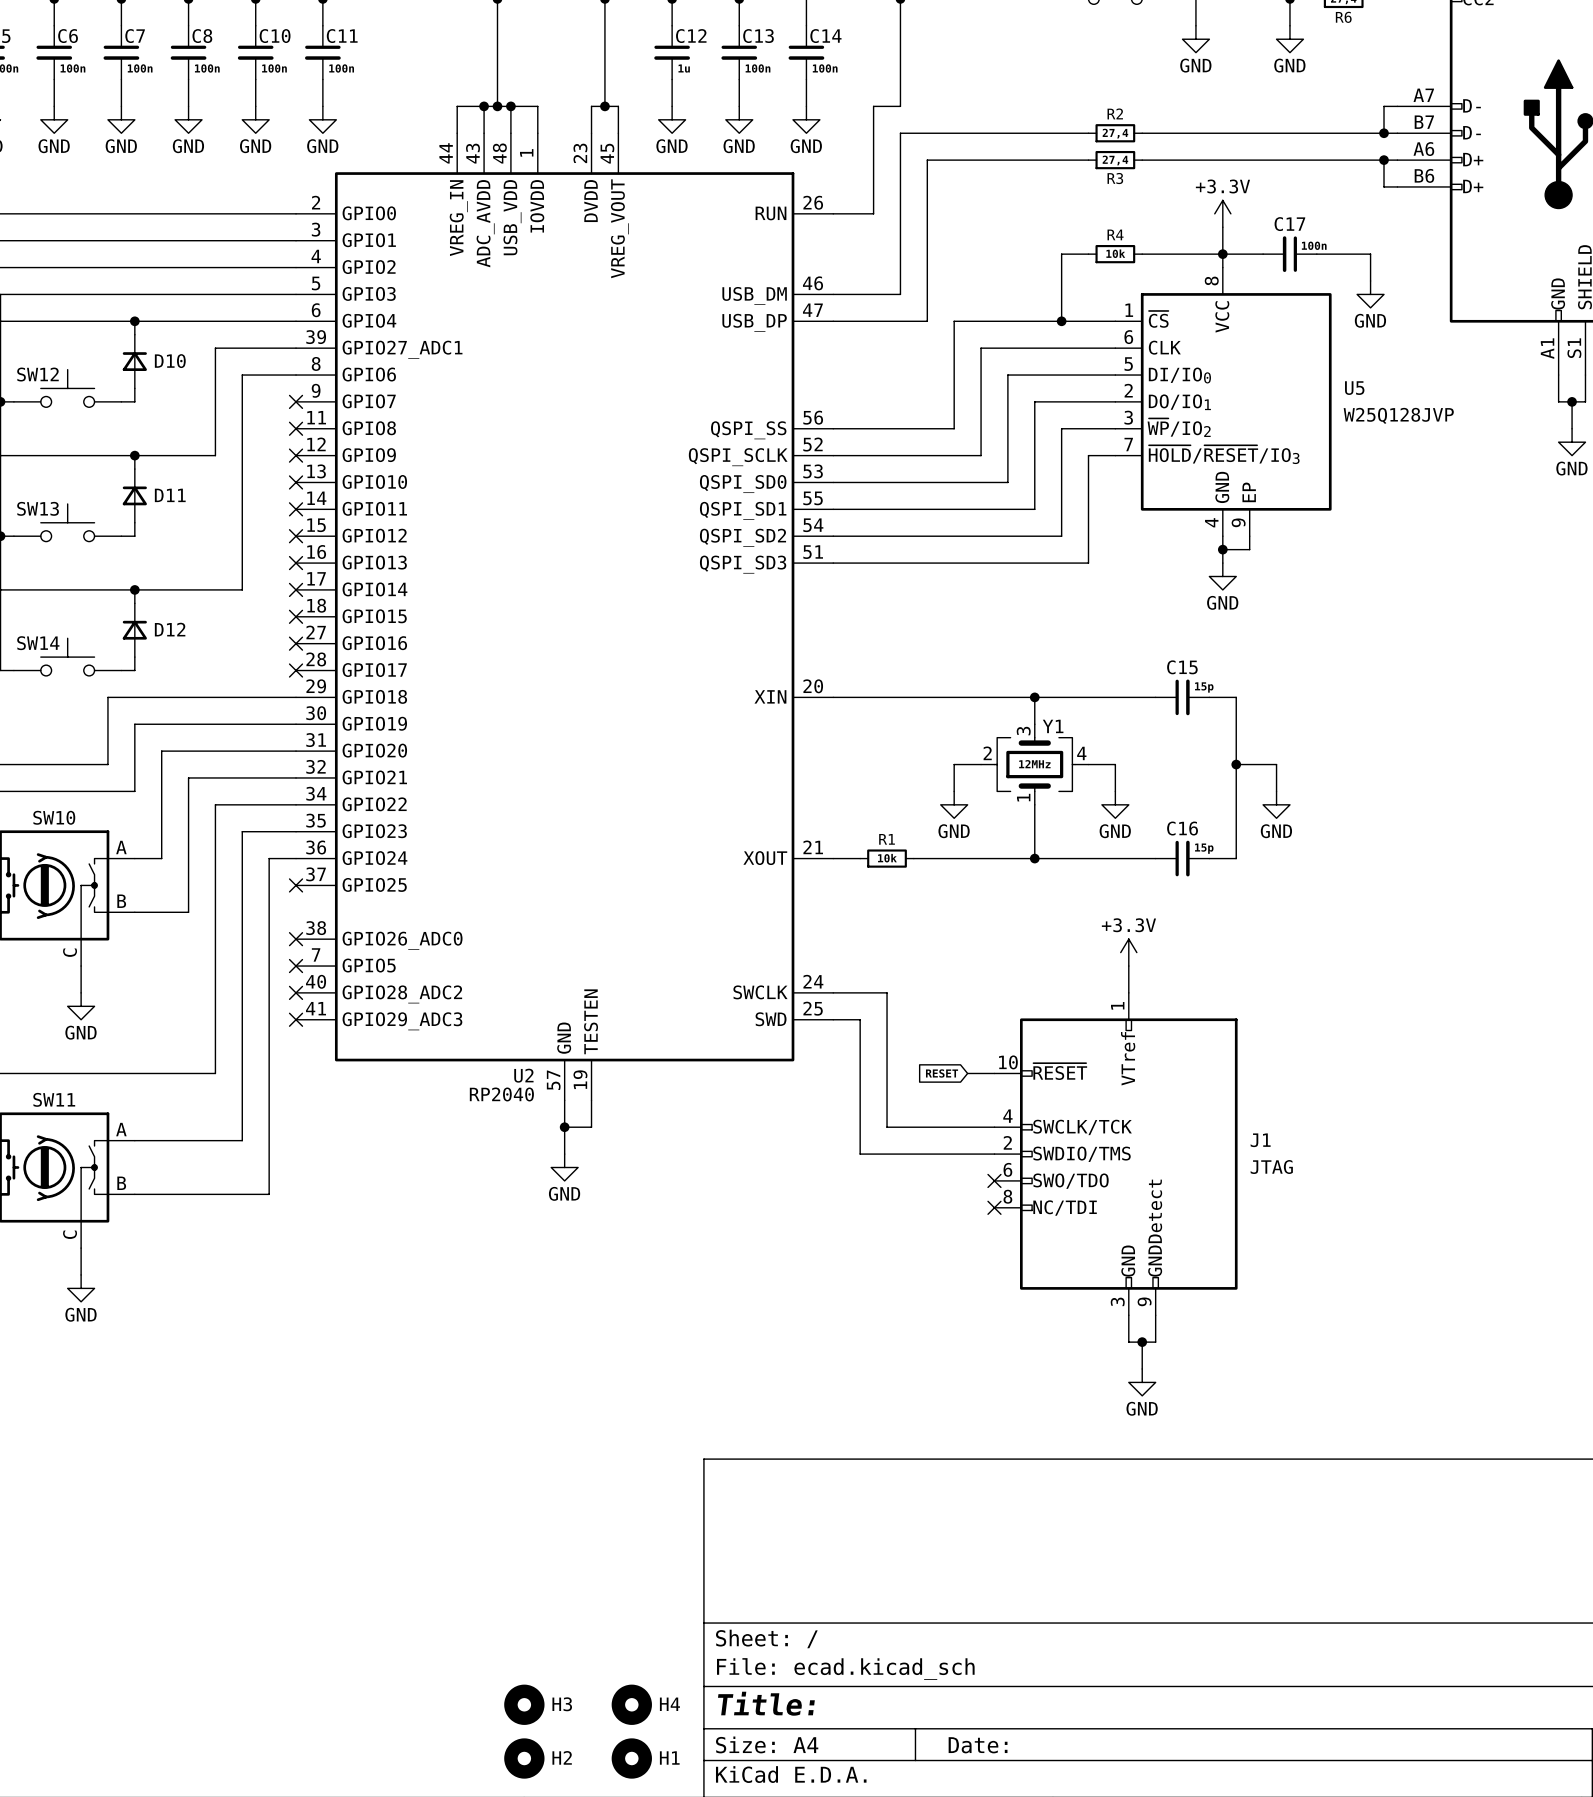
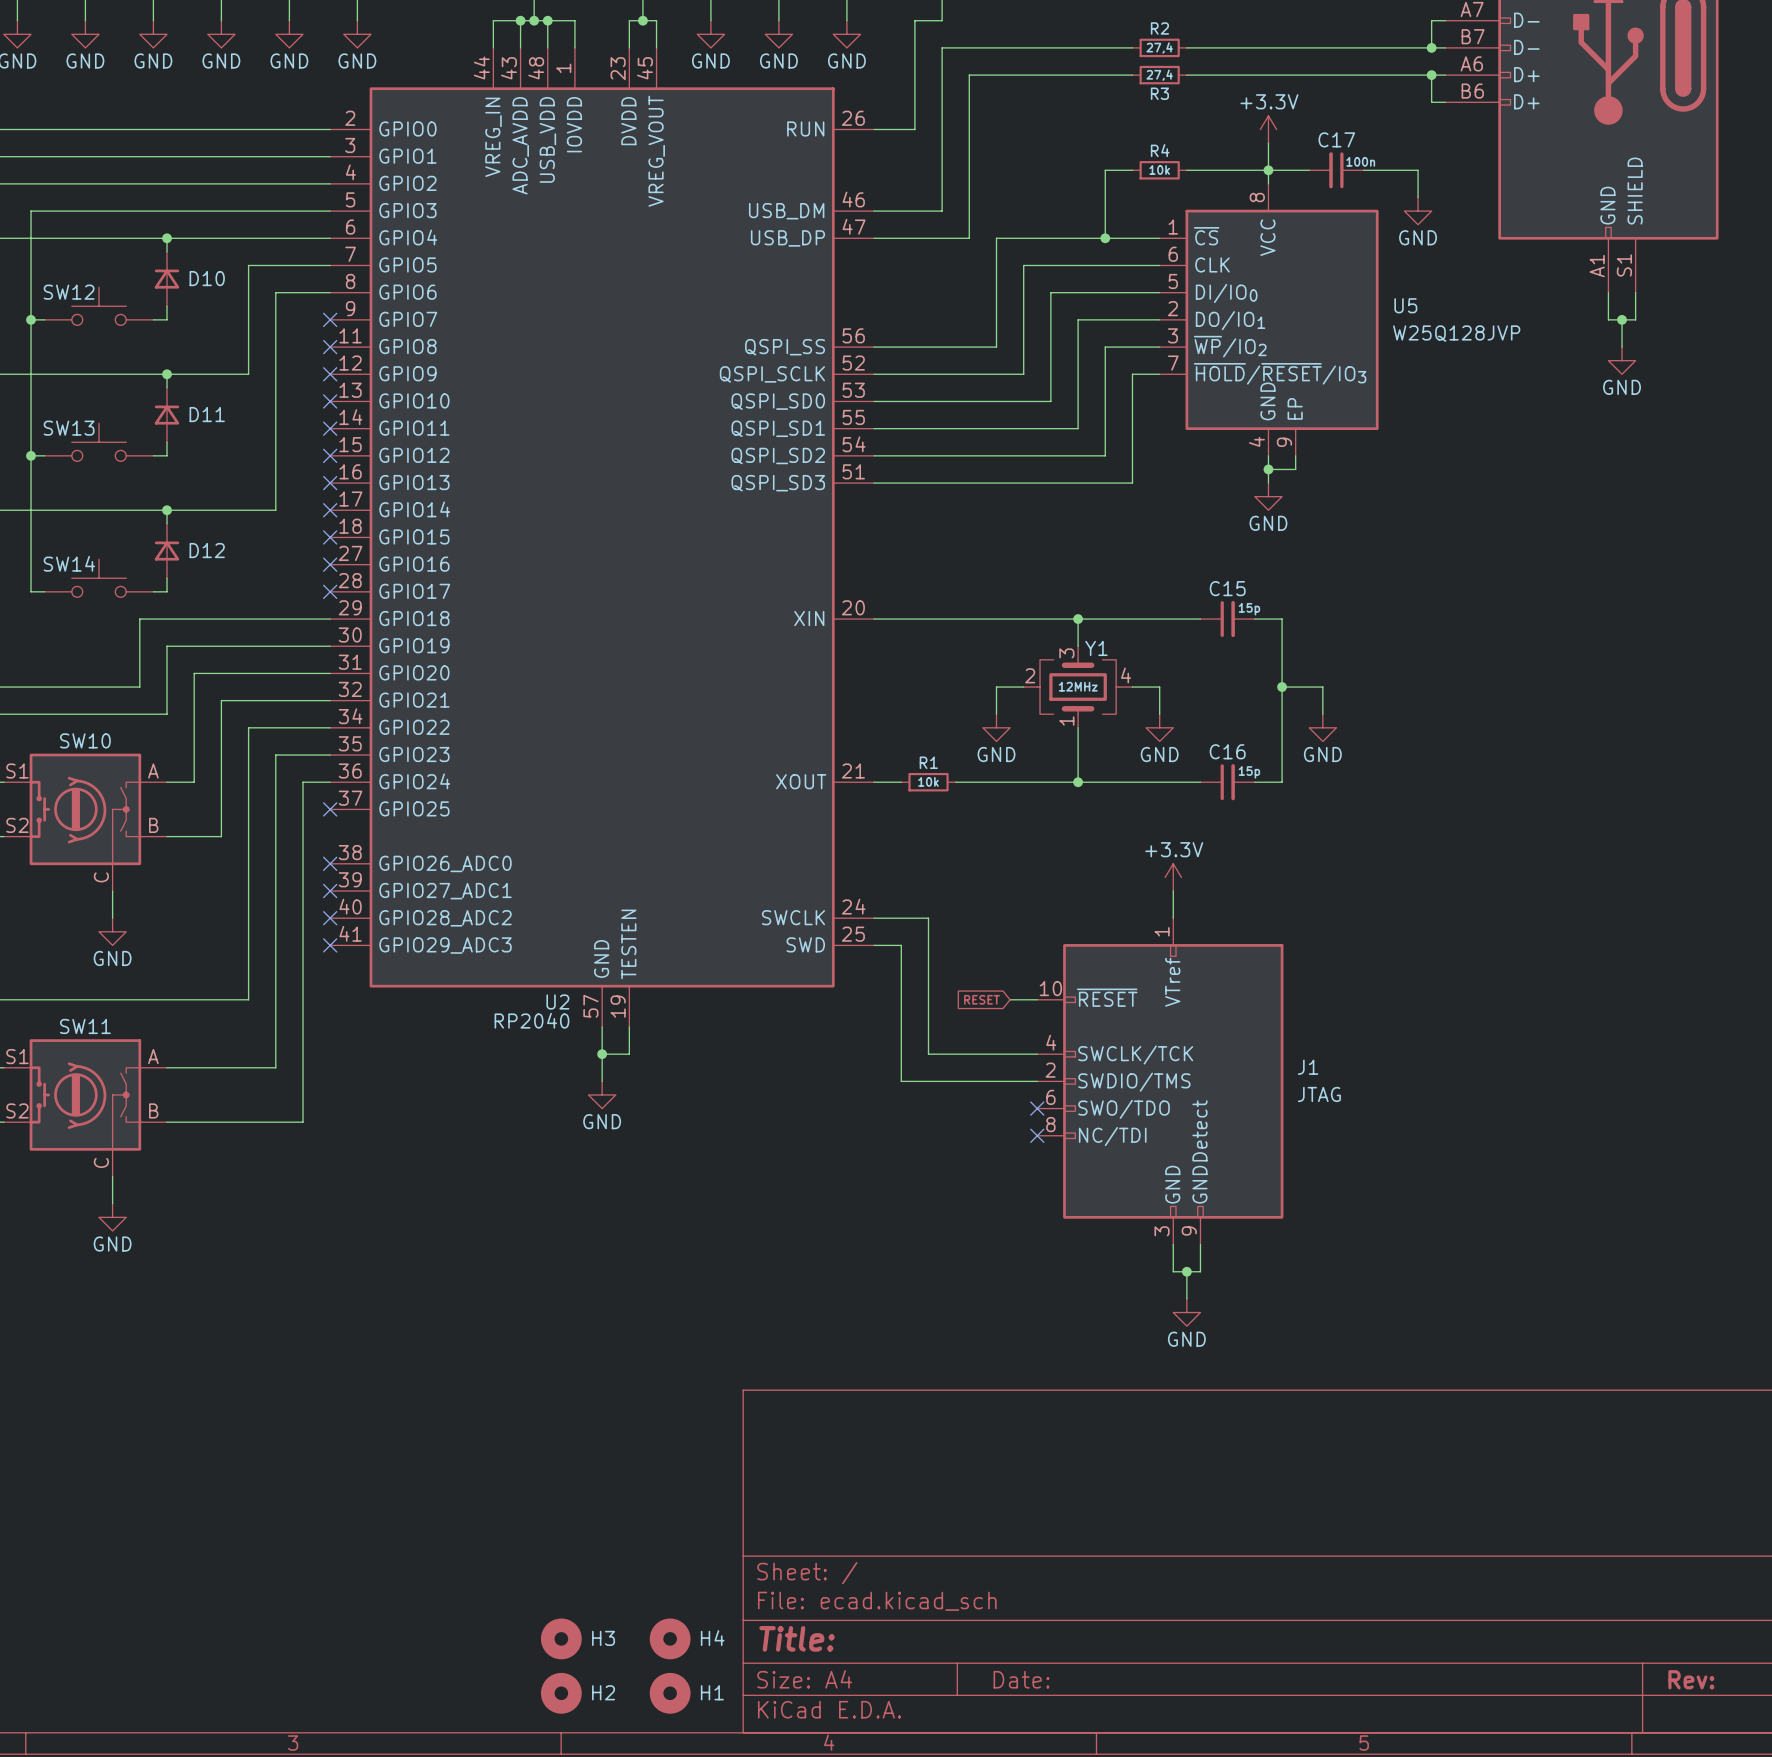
U2 pin number: 39 (316, 337) -> 7 (350, 254)
U2 pin name: GPIO27_ADC1 (402, 349) -> GPIO5 (407, 264)
U2 pin number: 7 (316, 954) -> 39 (350, 879)
U2 pin name: GPIO5 (369, 965) -> GPIO27_ADC1 (445, 891)

